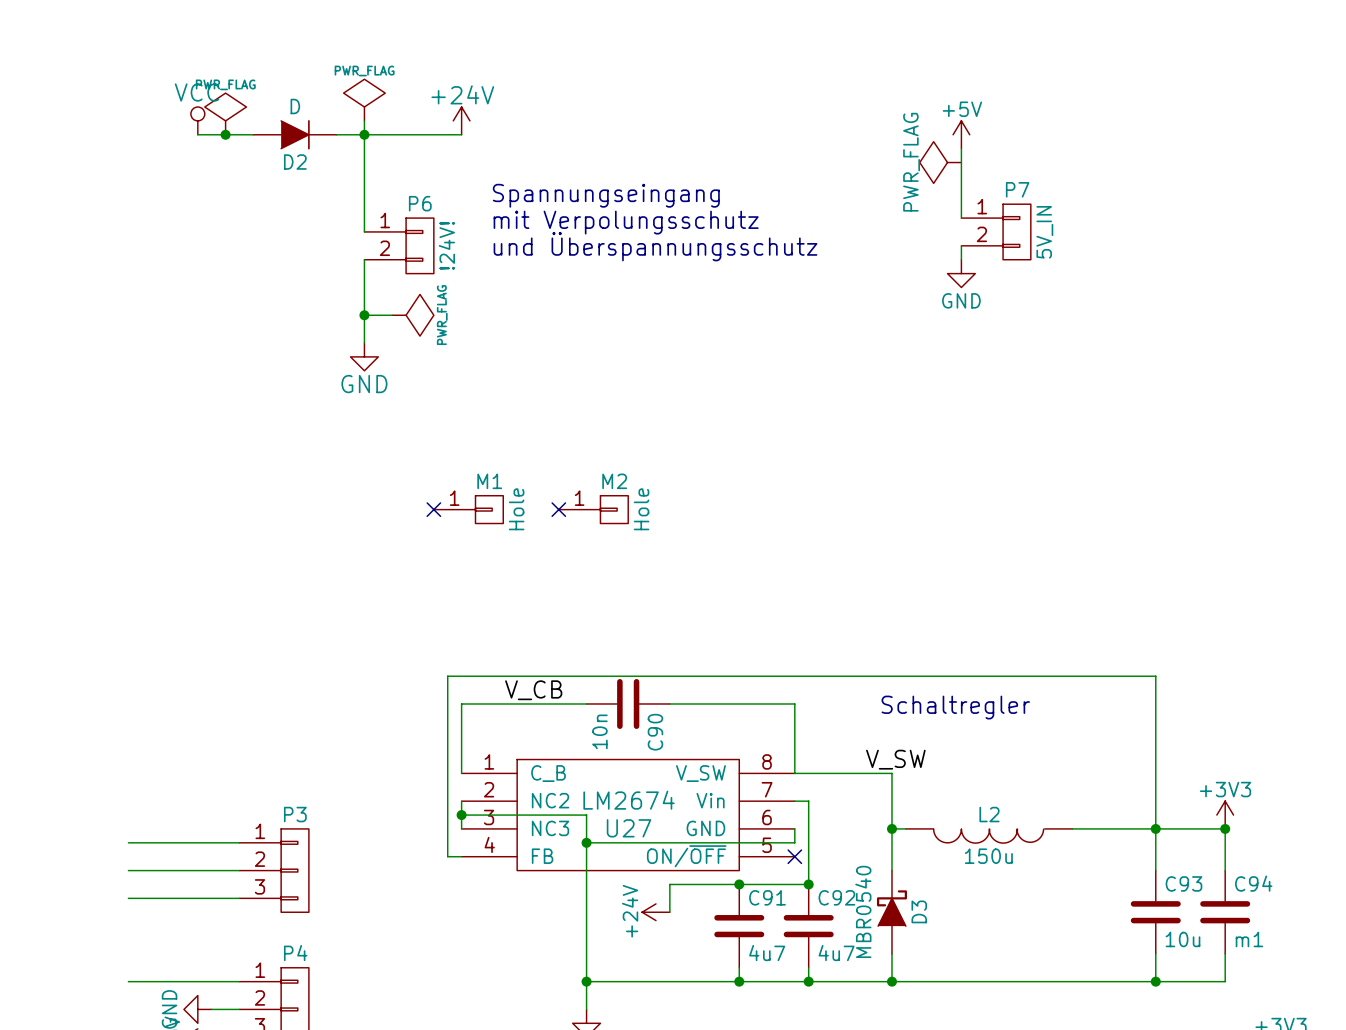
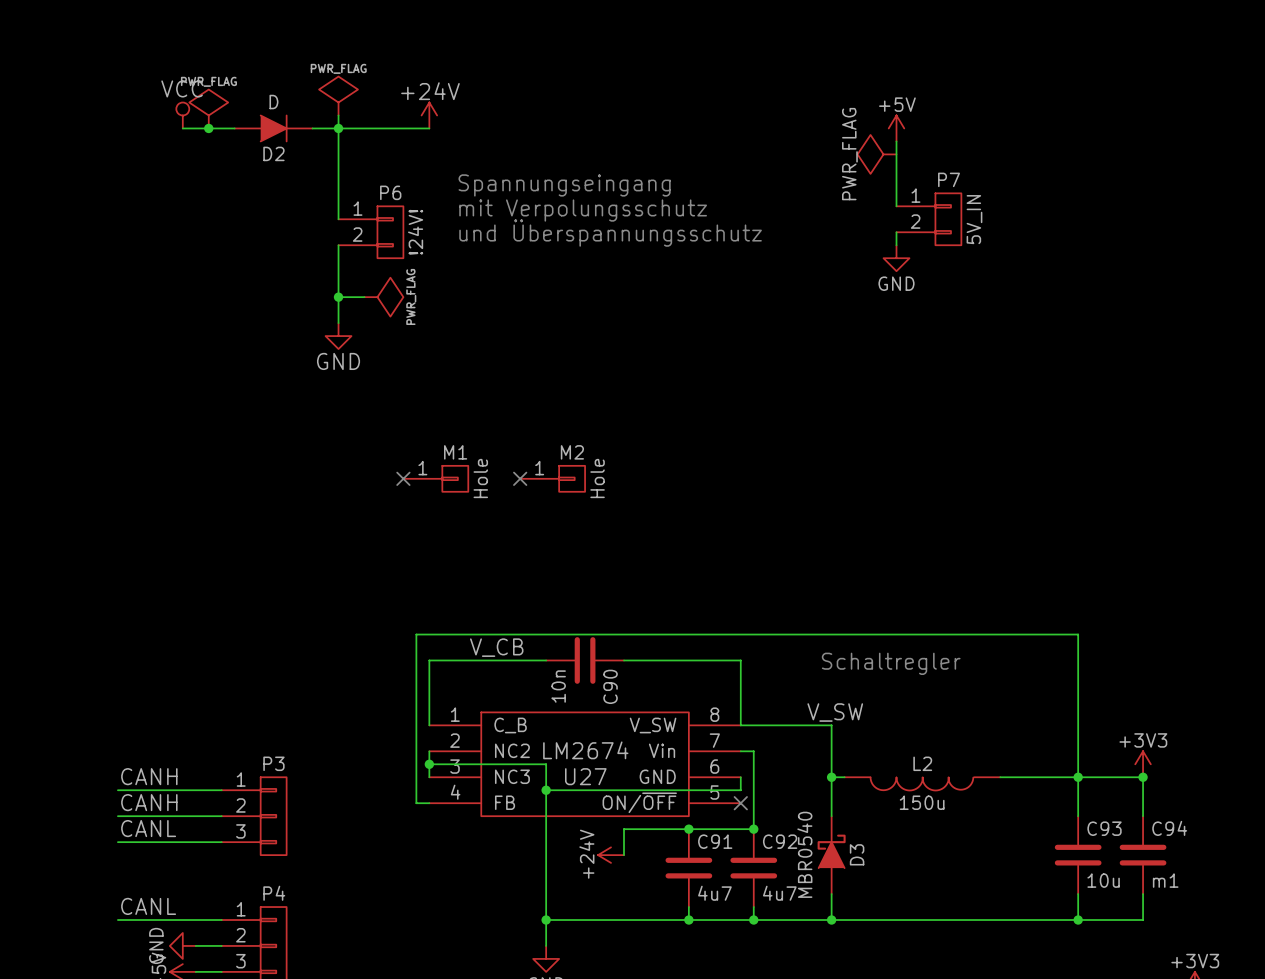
label: none -> CANH (149, 776)
label: none -> CANH (149, 802)
label: none -> CANL (148, 828)
label: none -> CANL (148, 906)

